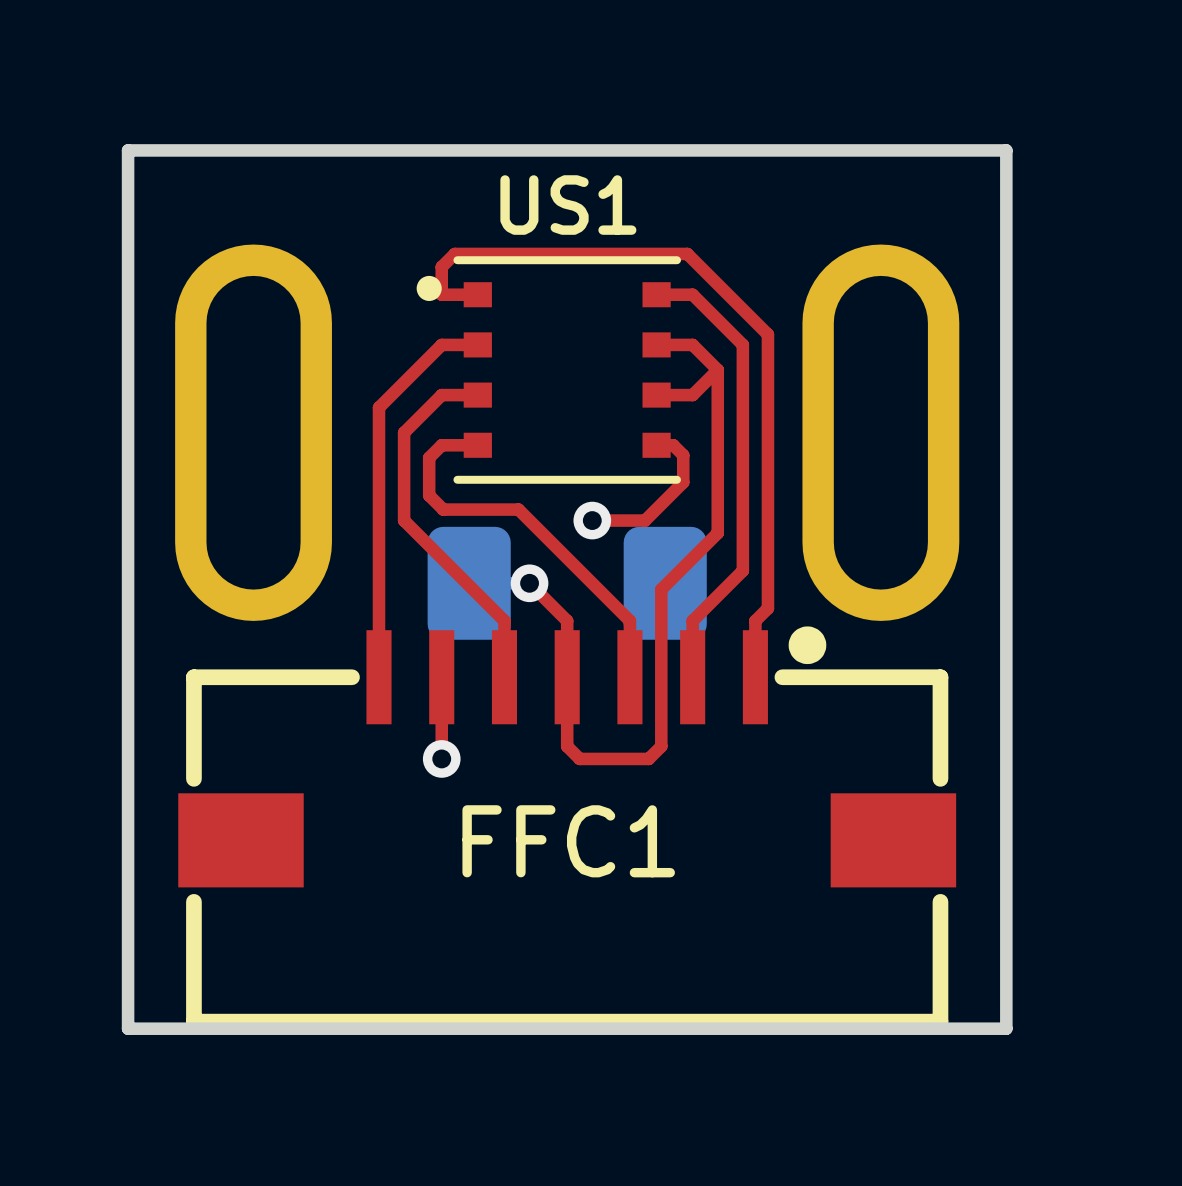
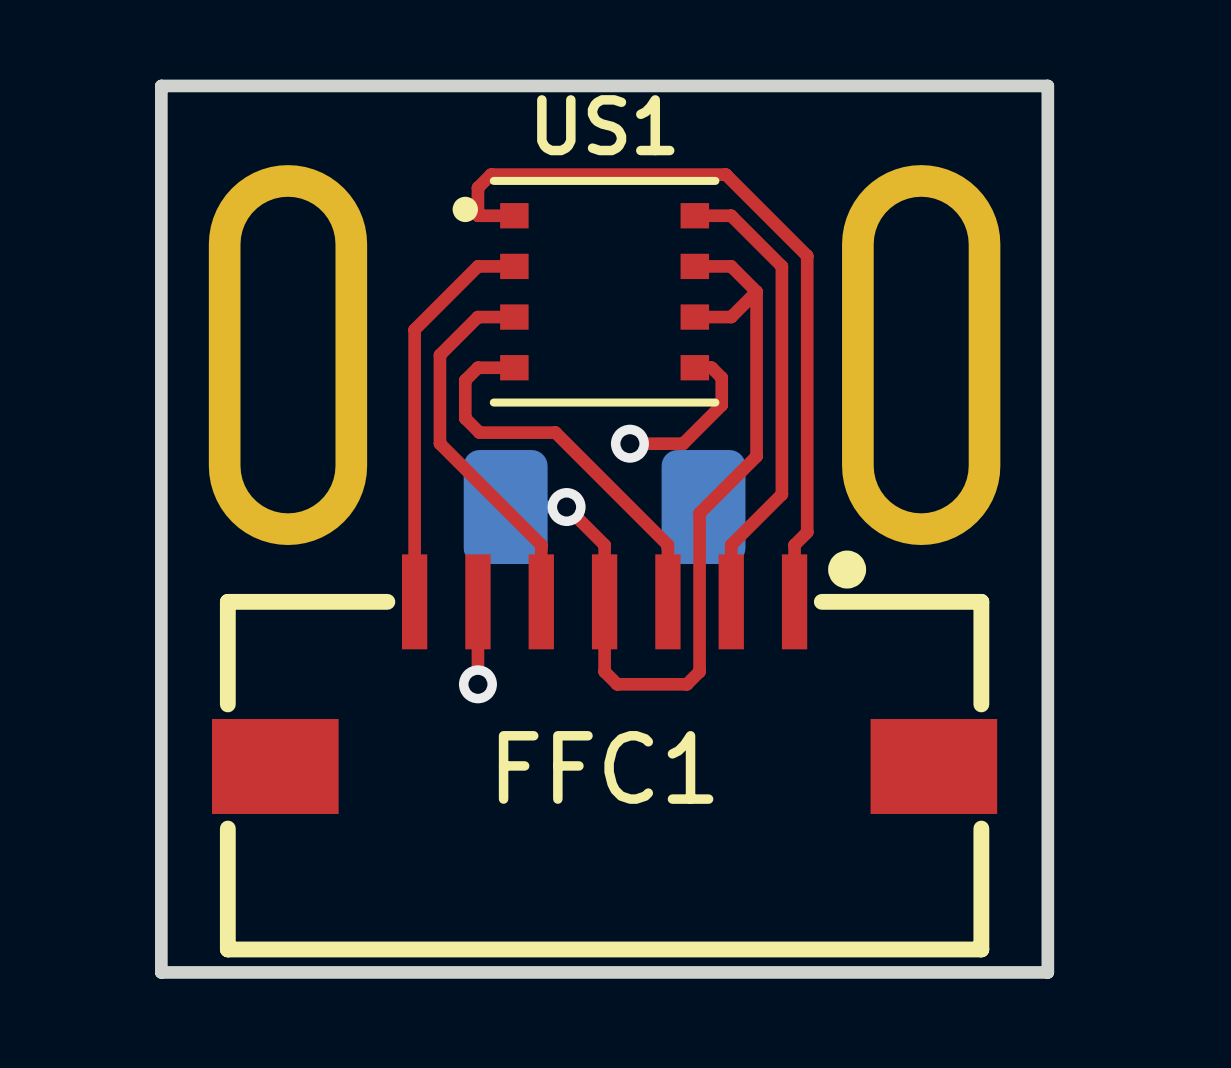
board edge: (128, 166) (128, 150) (1006, 150) (1006, 166) -> (161, 85) (1047, 85)
board edge: (128, 1028) (1006, 1028) -> (161, 956) (161, 972) (1047, 972) (1047, 956)

